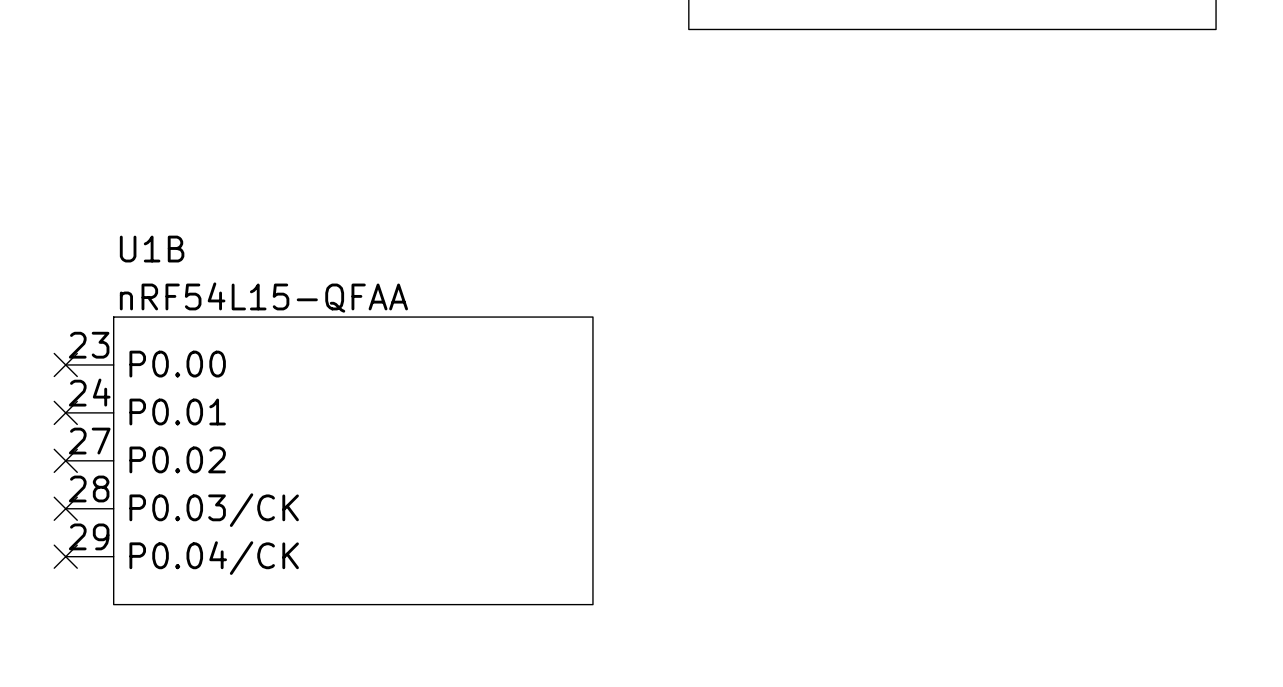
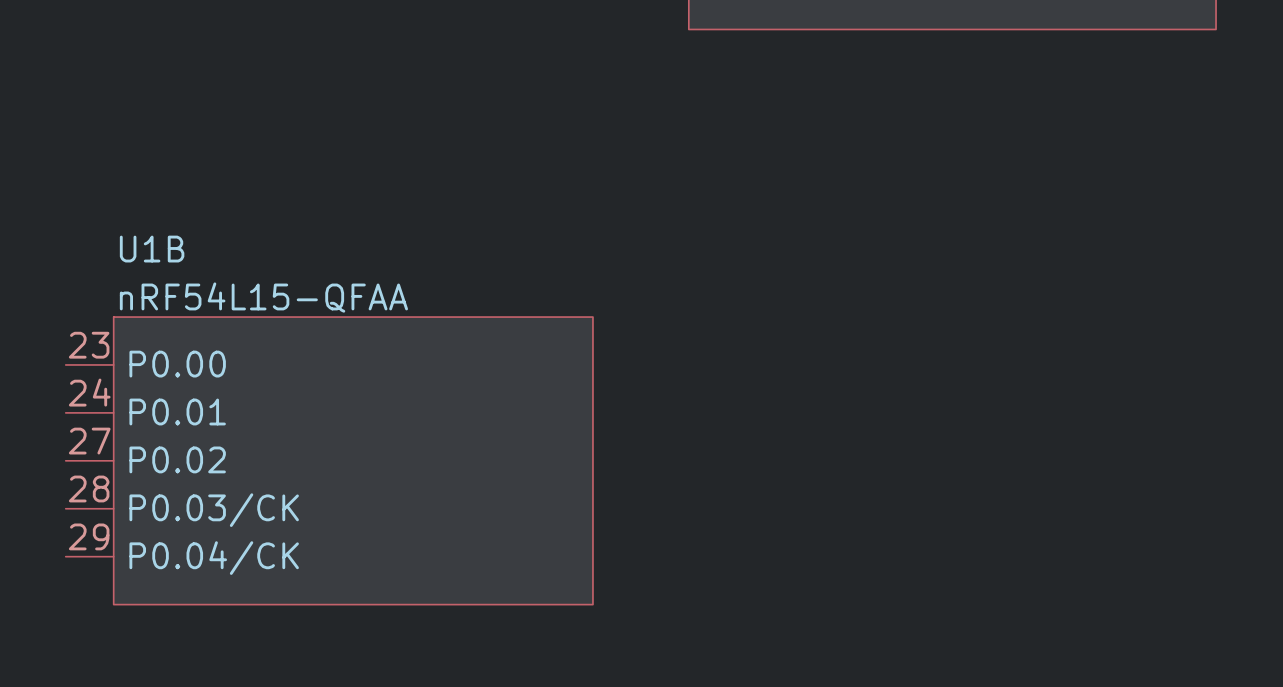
no-connect mark: (65, 364) -> none
no-connect mark: (65, 412) -> none
no-connect mark: (65, 460) -> none
no-connect mark: (65, 508) -> none
no-connect mark: (65, 556) -> none

